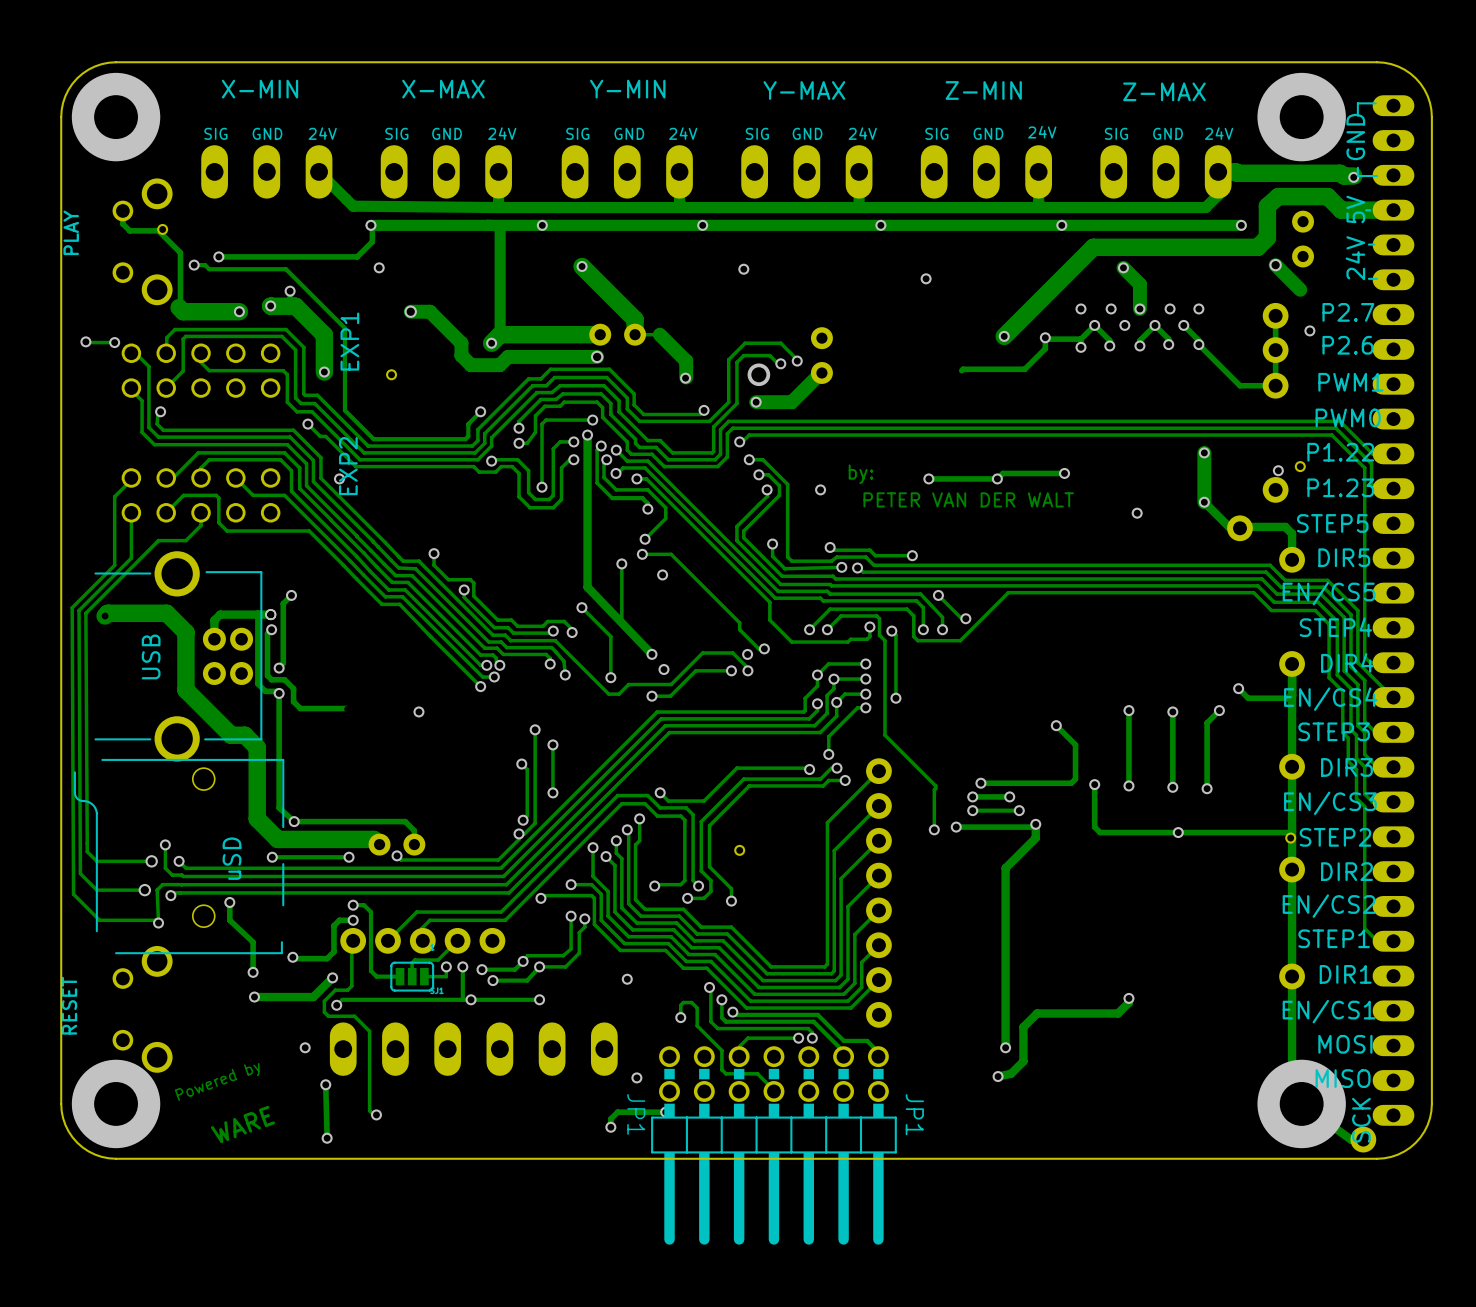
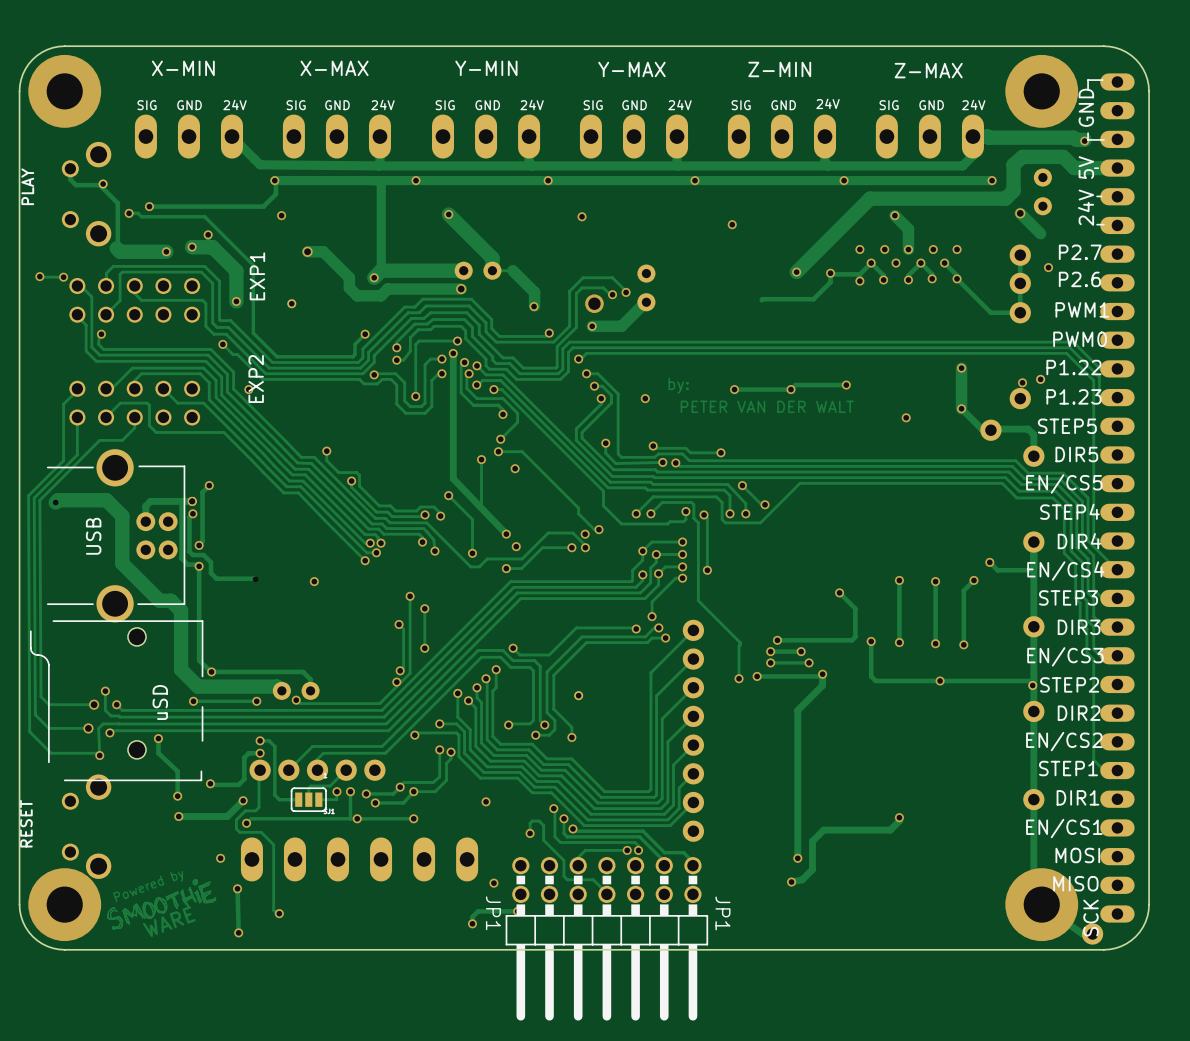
drawing: none -> [107, 879, 217, 930]

